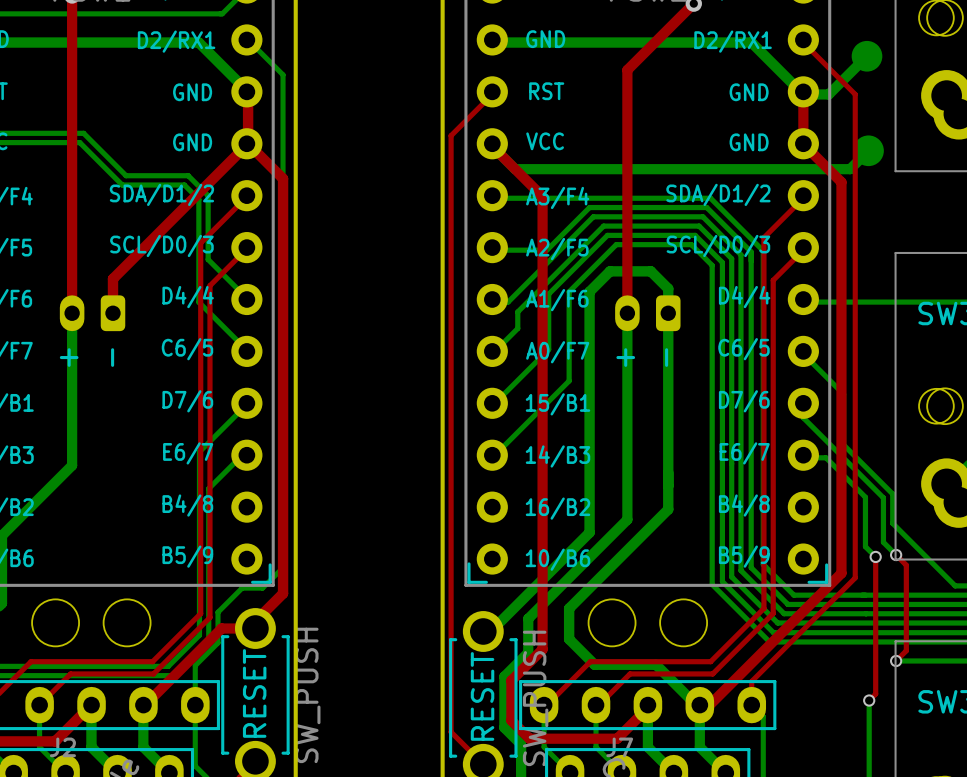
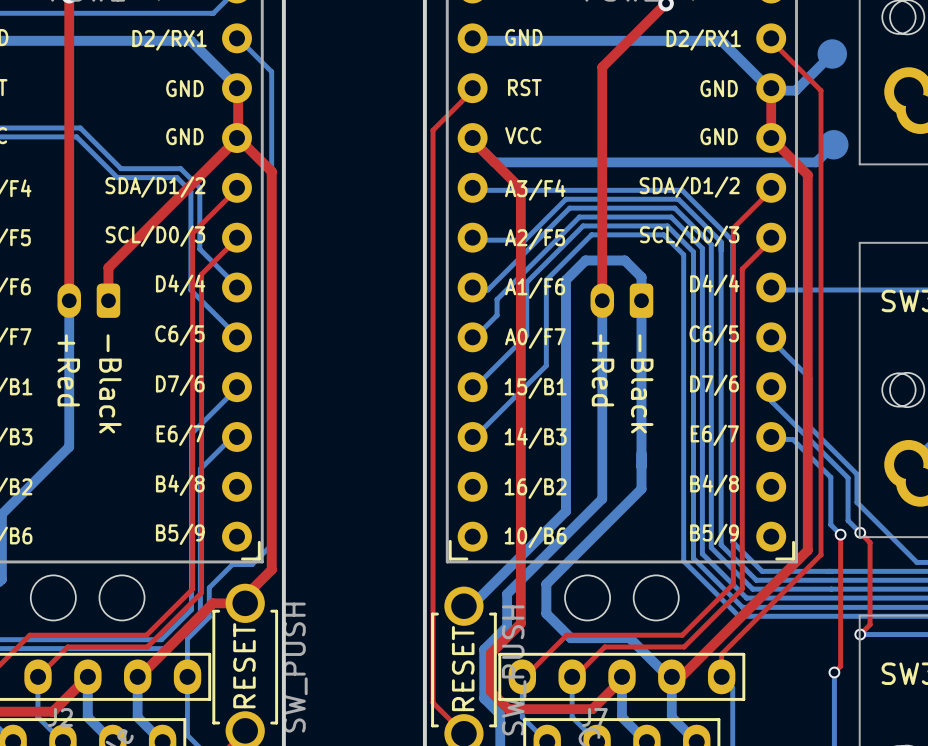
text: + (69, 357) -> +Red (68, 370)
text: - (112, 357) -> -Black (110, 383)
text: + (625, 357) -> +Red (603, 370)
text: - (666, 357) -> -Black (642, 383)

